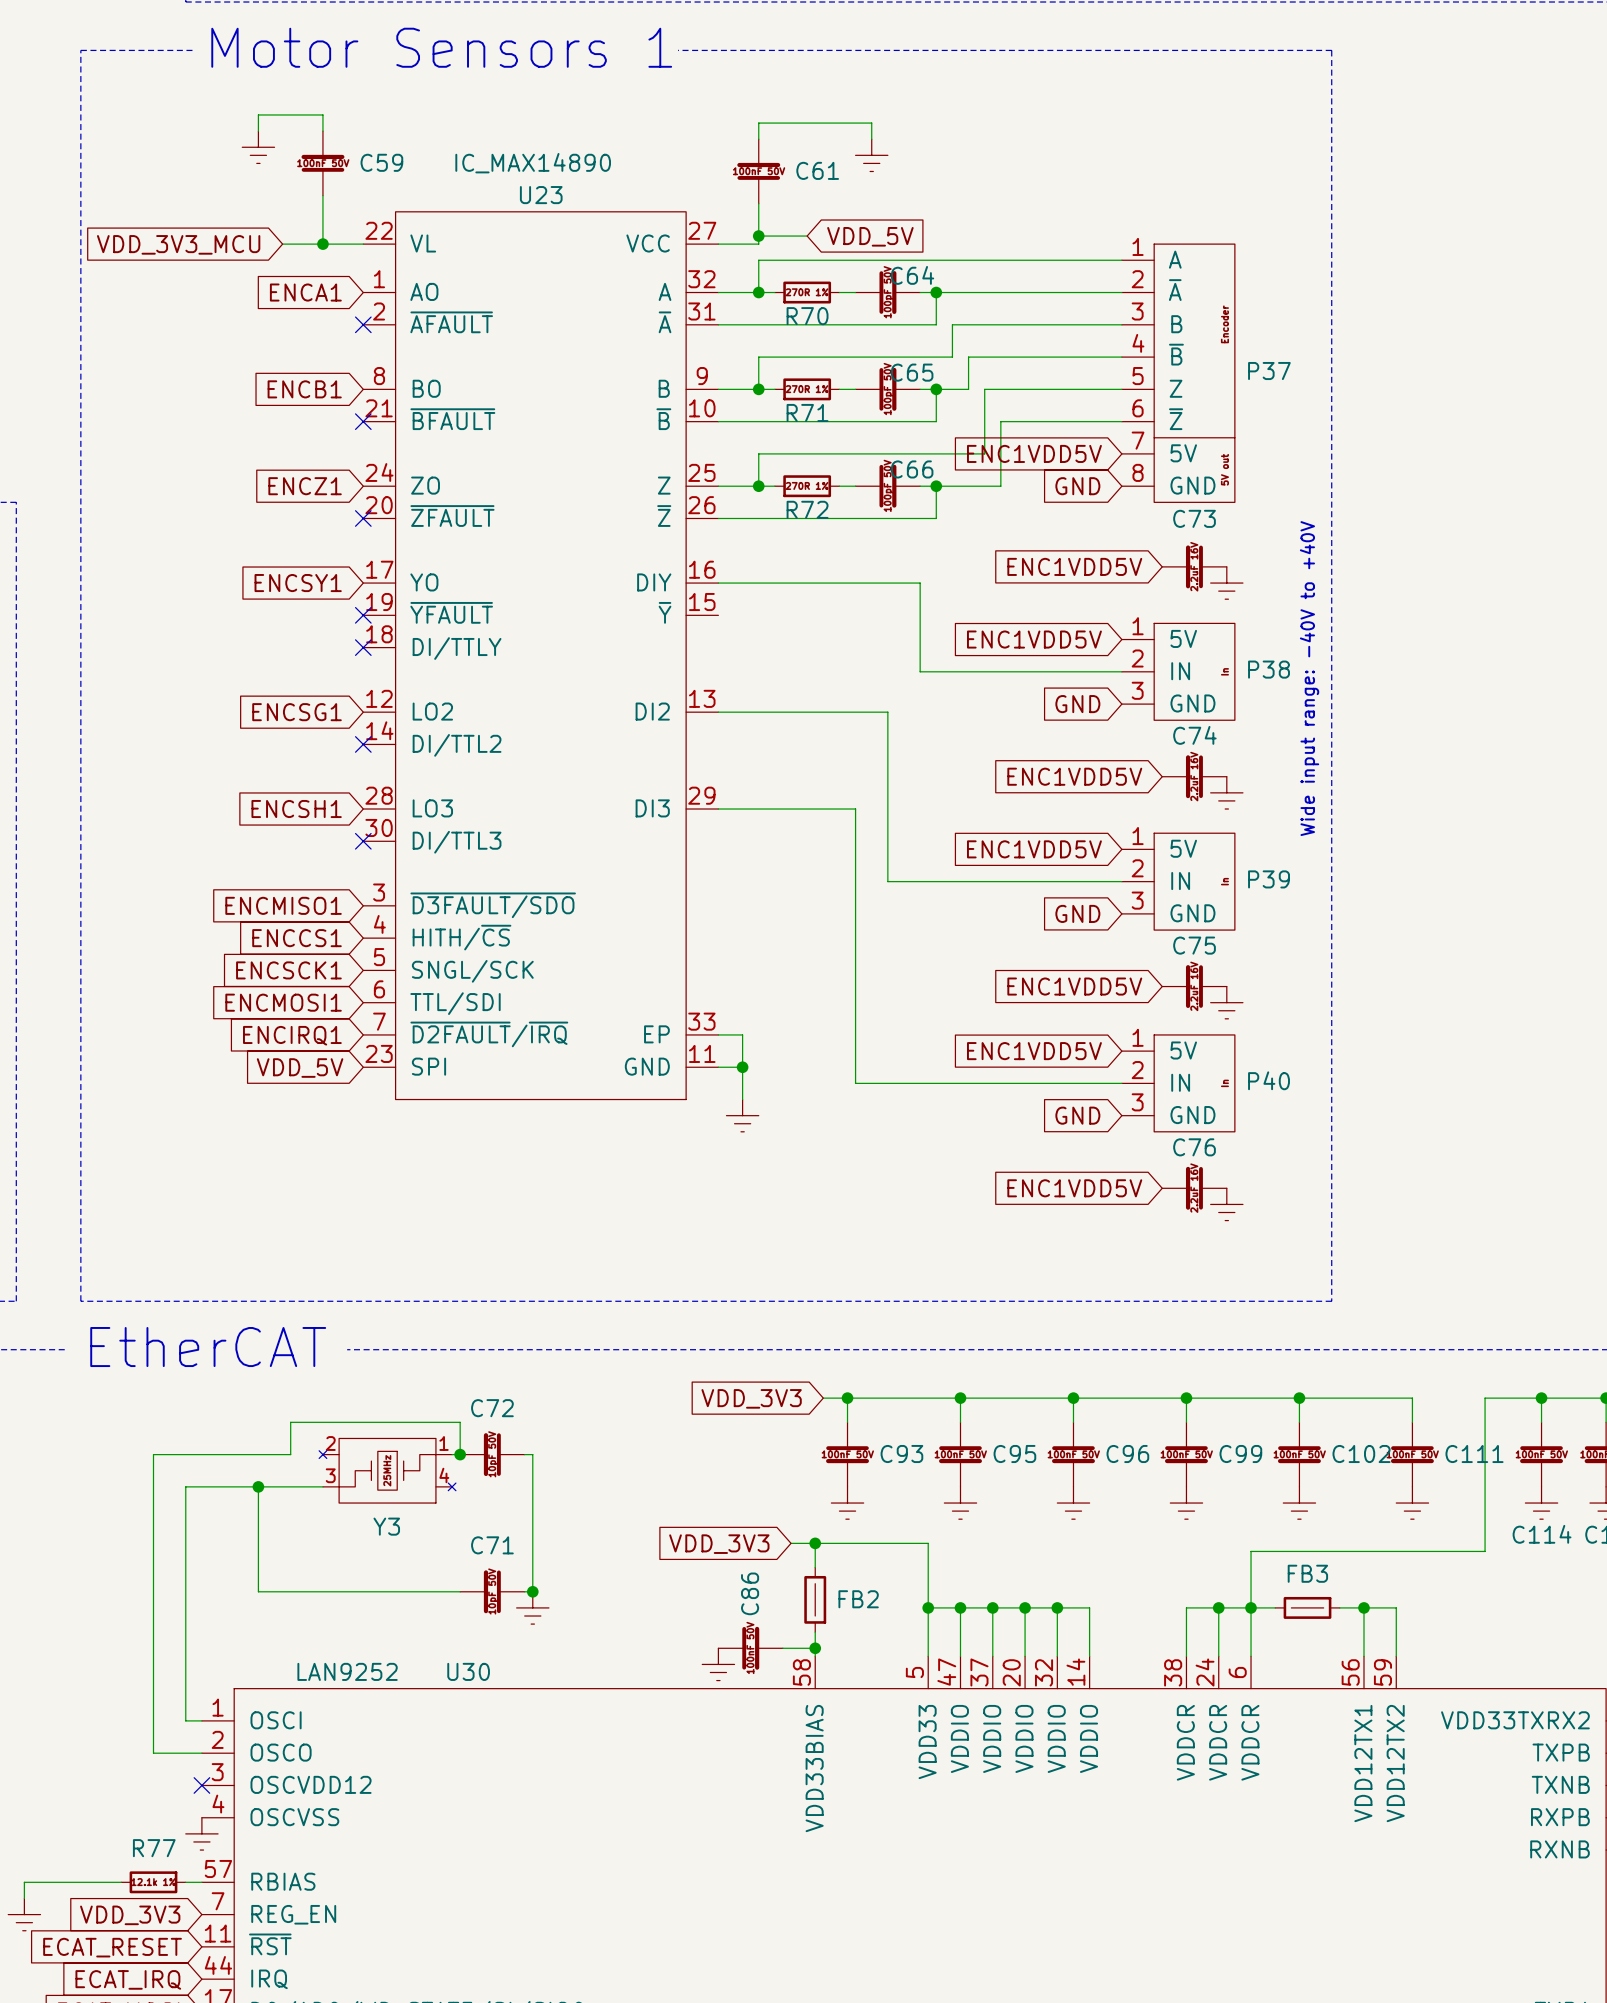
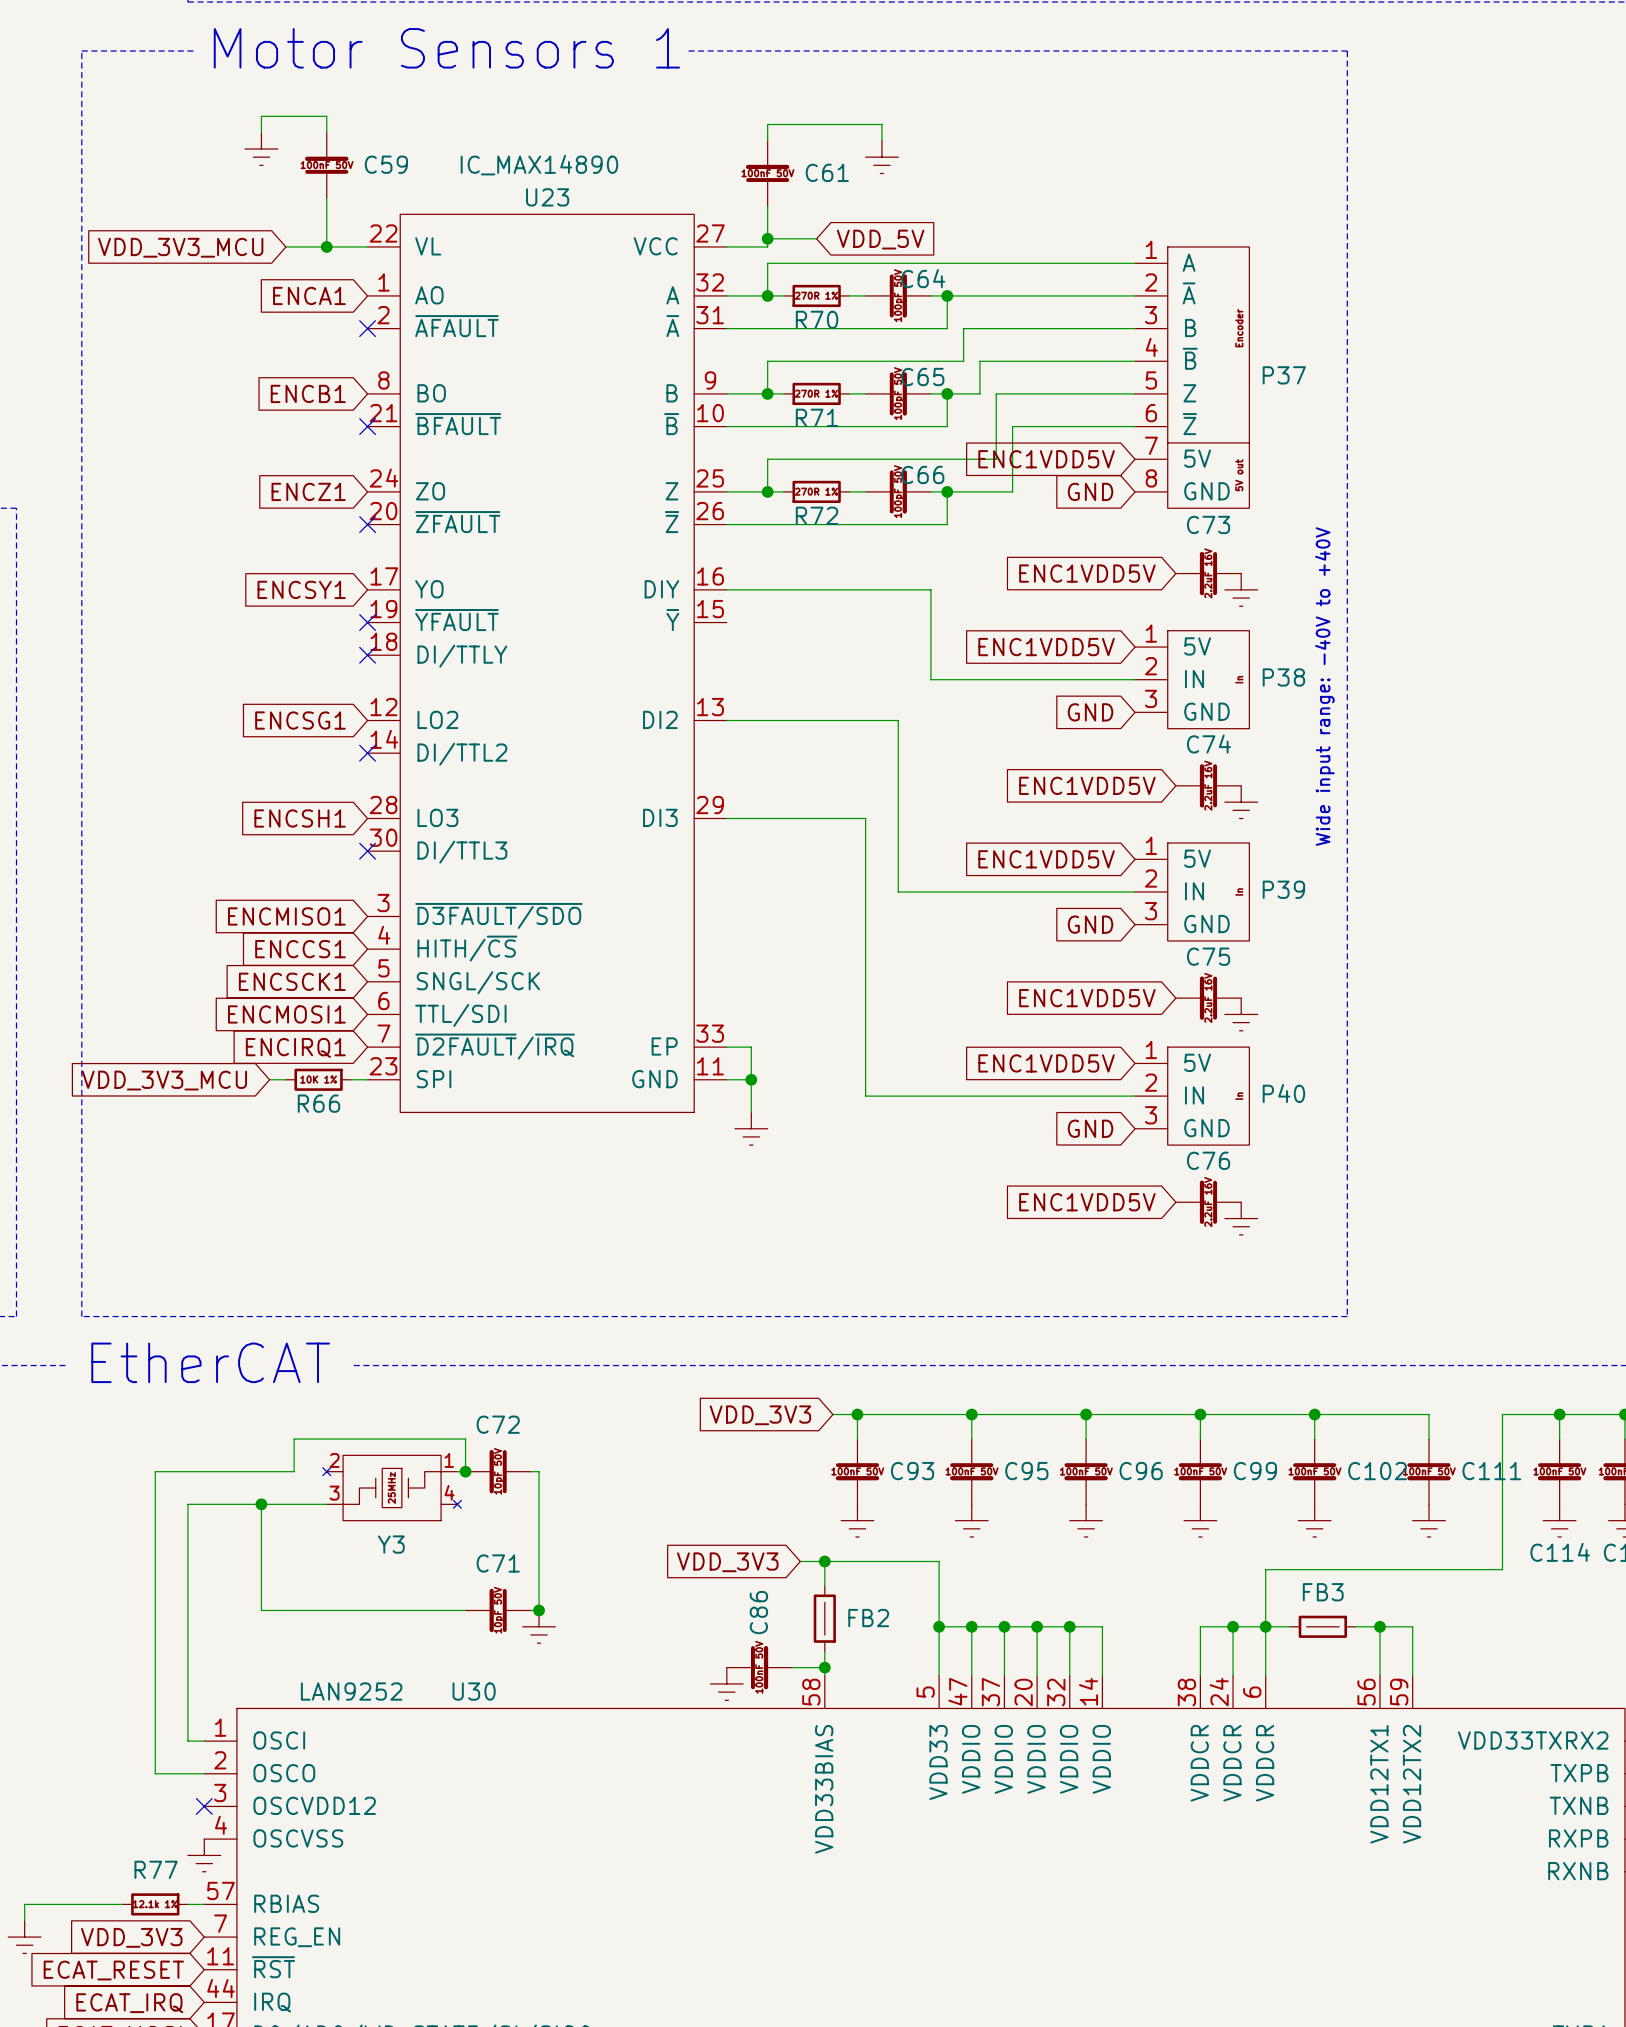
wire: none -> (269, 1079) (285, 1079)
R66: none -> (318, 1079)
wire: none -> (351, 1079) (367, 1079)
global label: none -> VDD_3V3_MCU (164, 1080)
global label: VDD_5V (300, 1068) -> none

